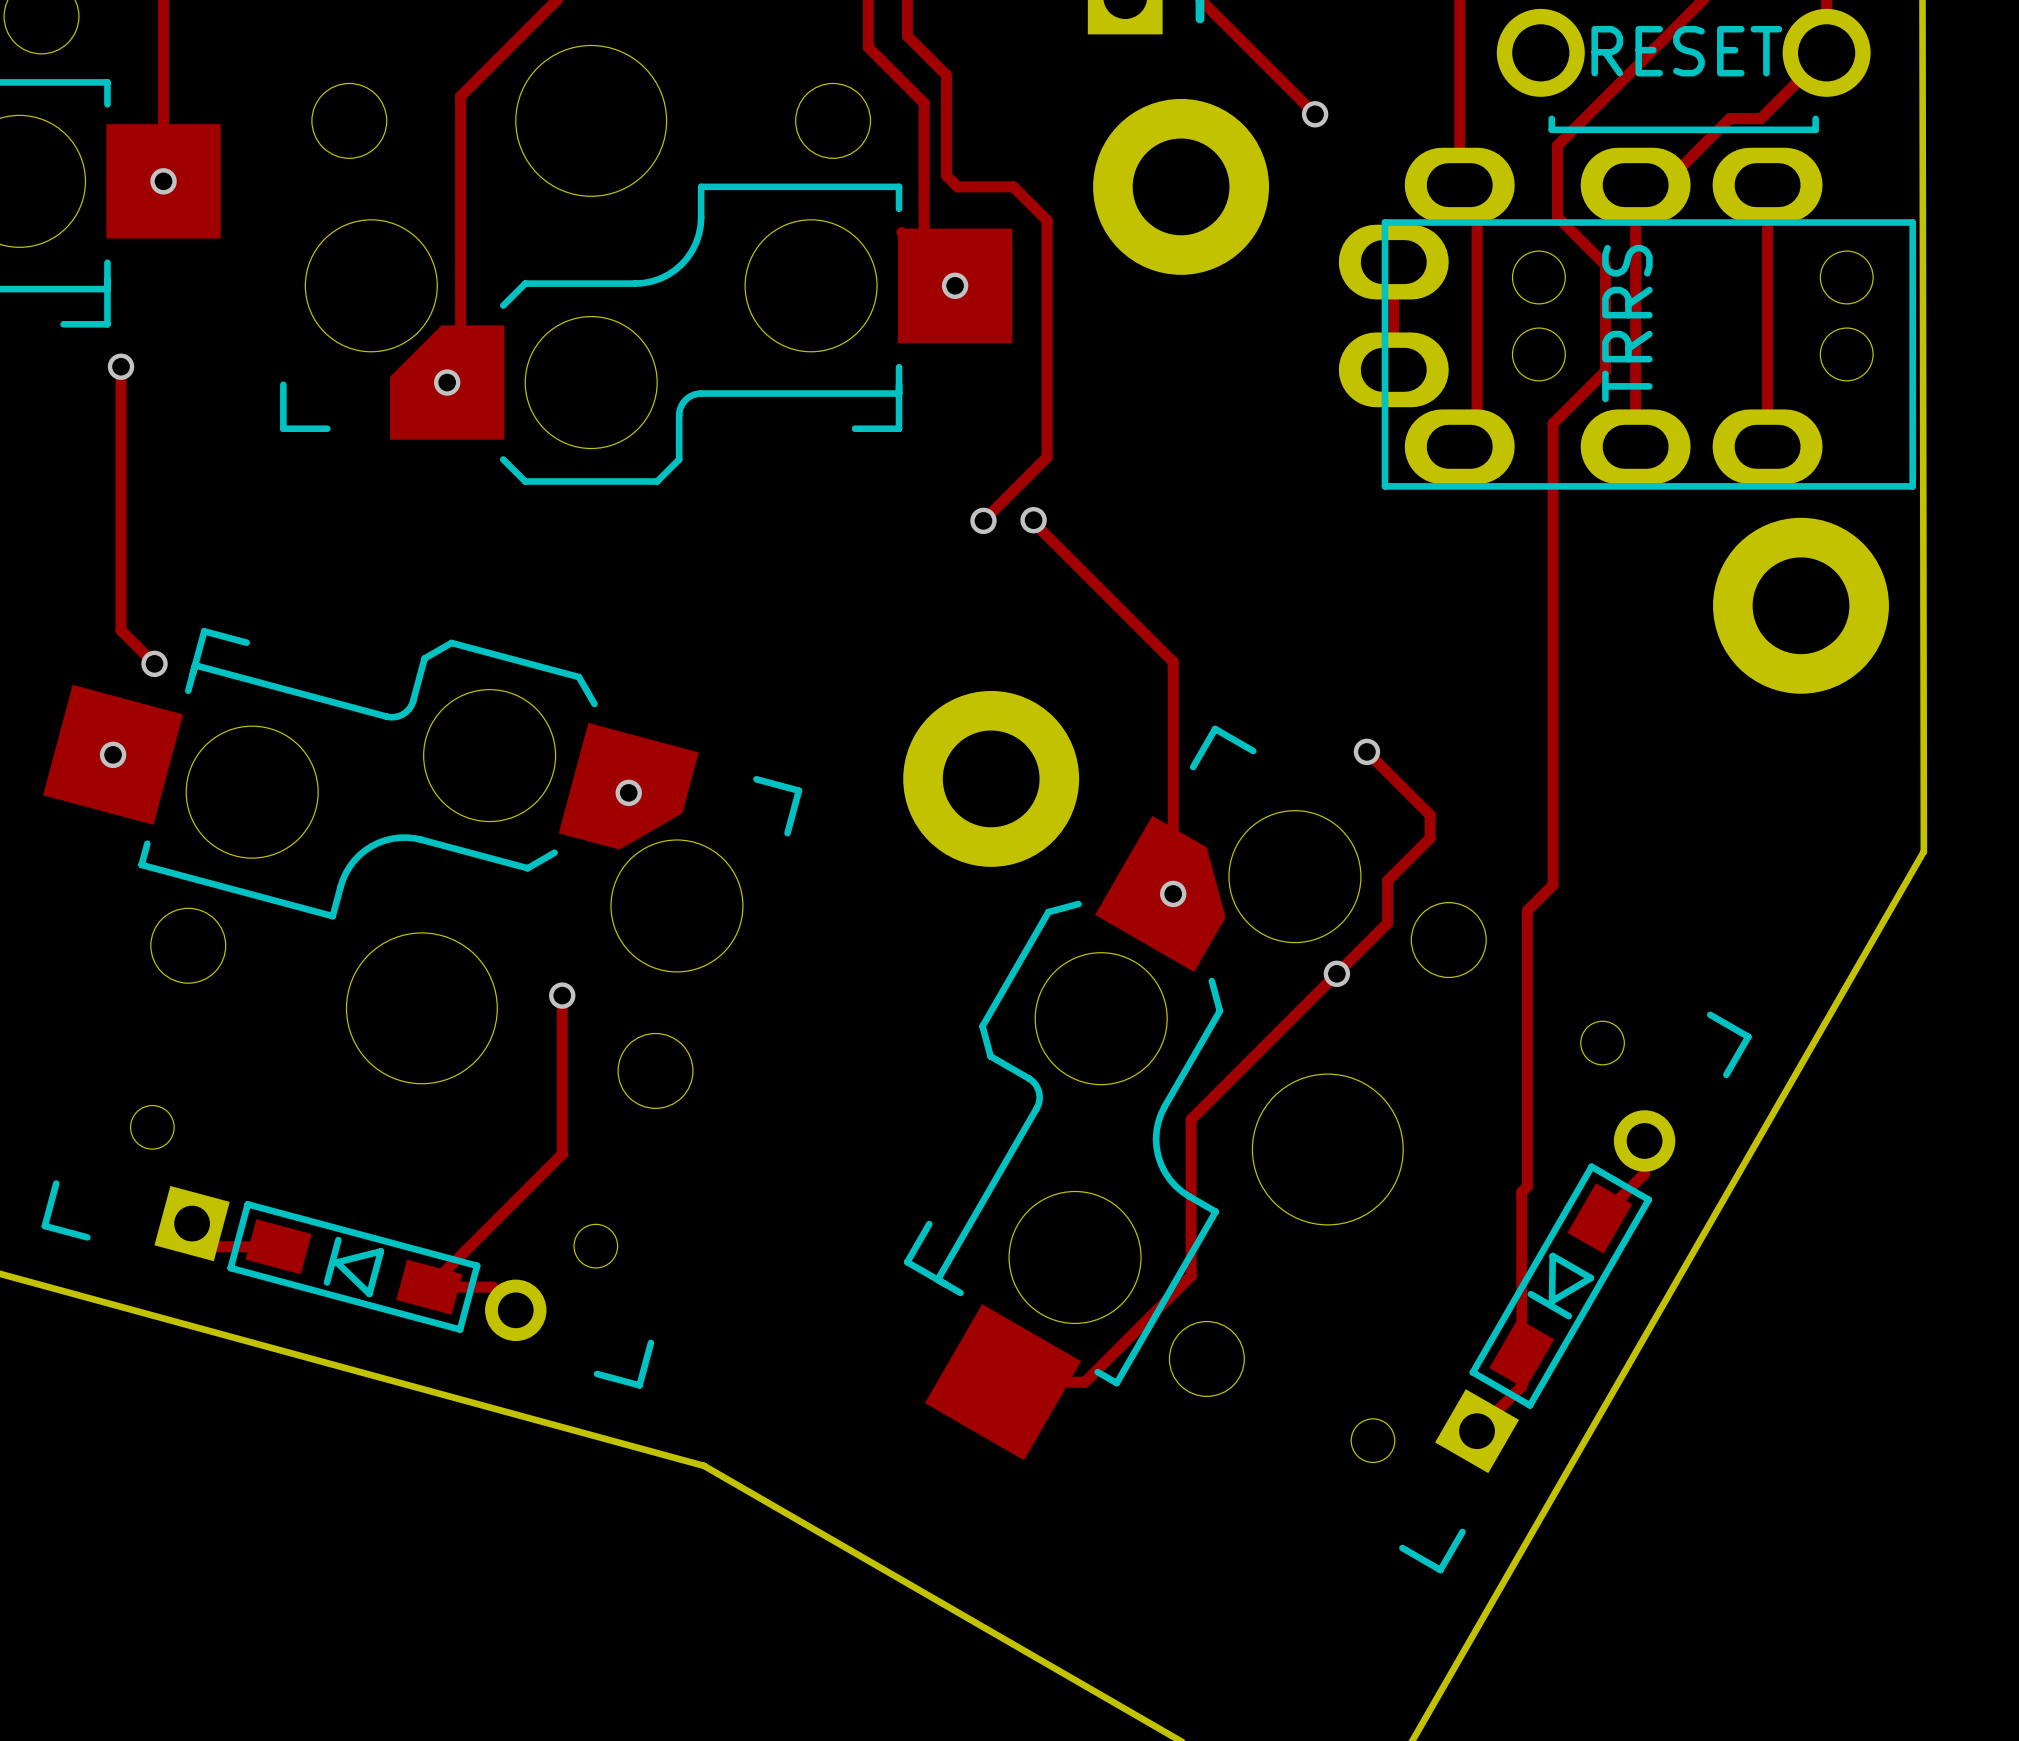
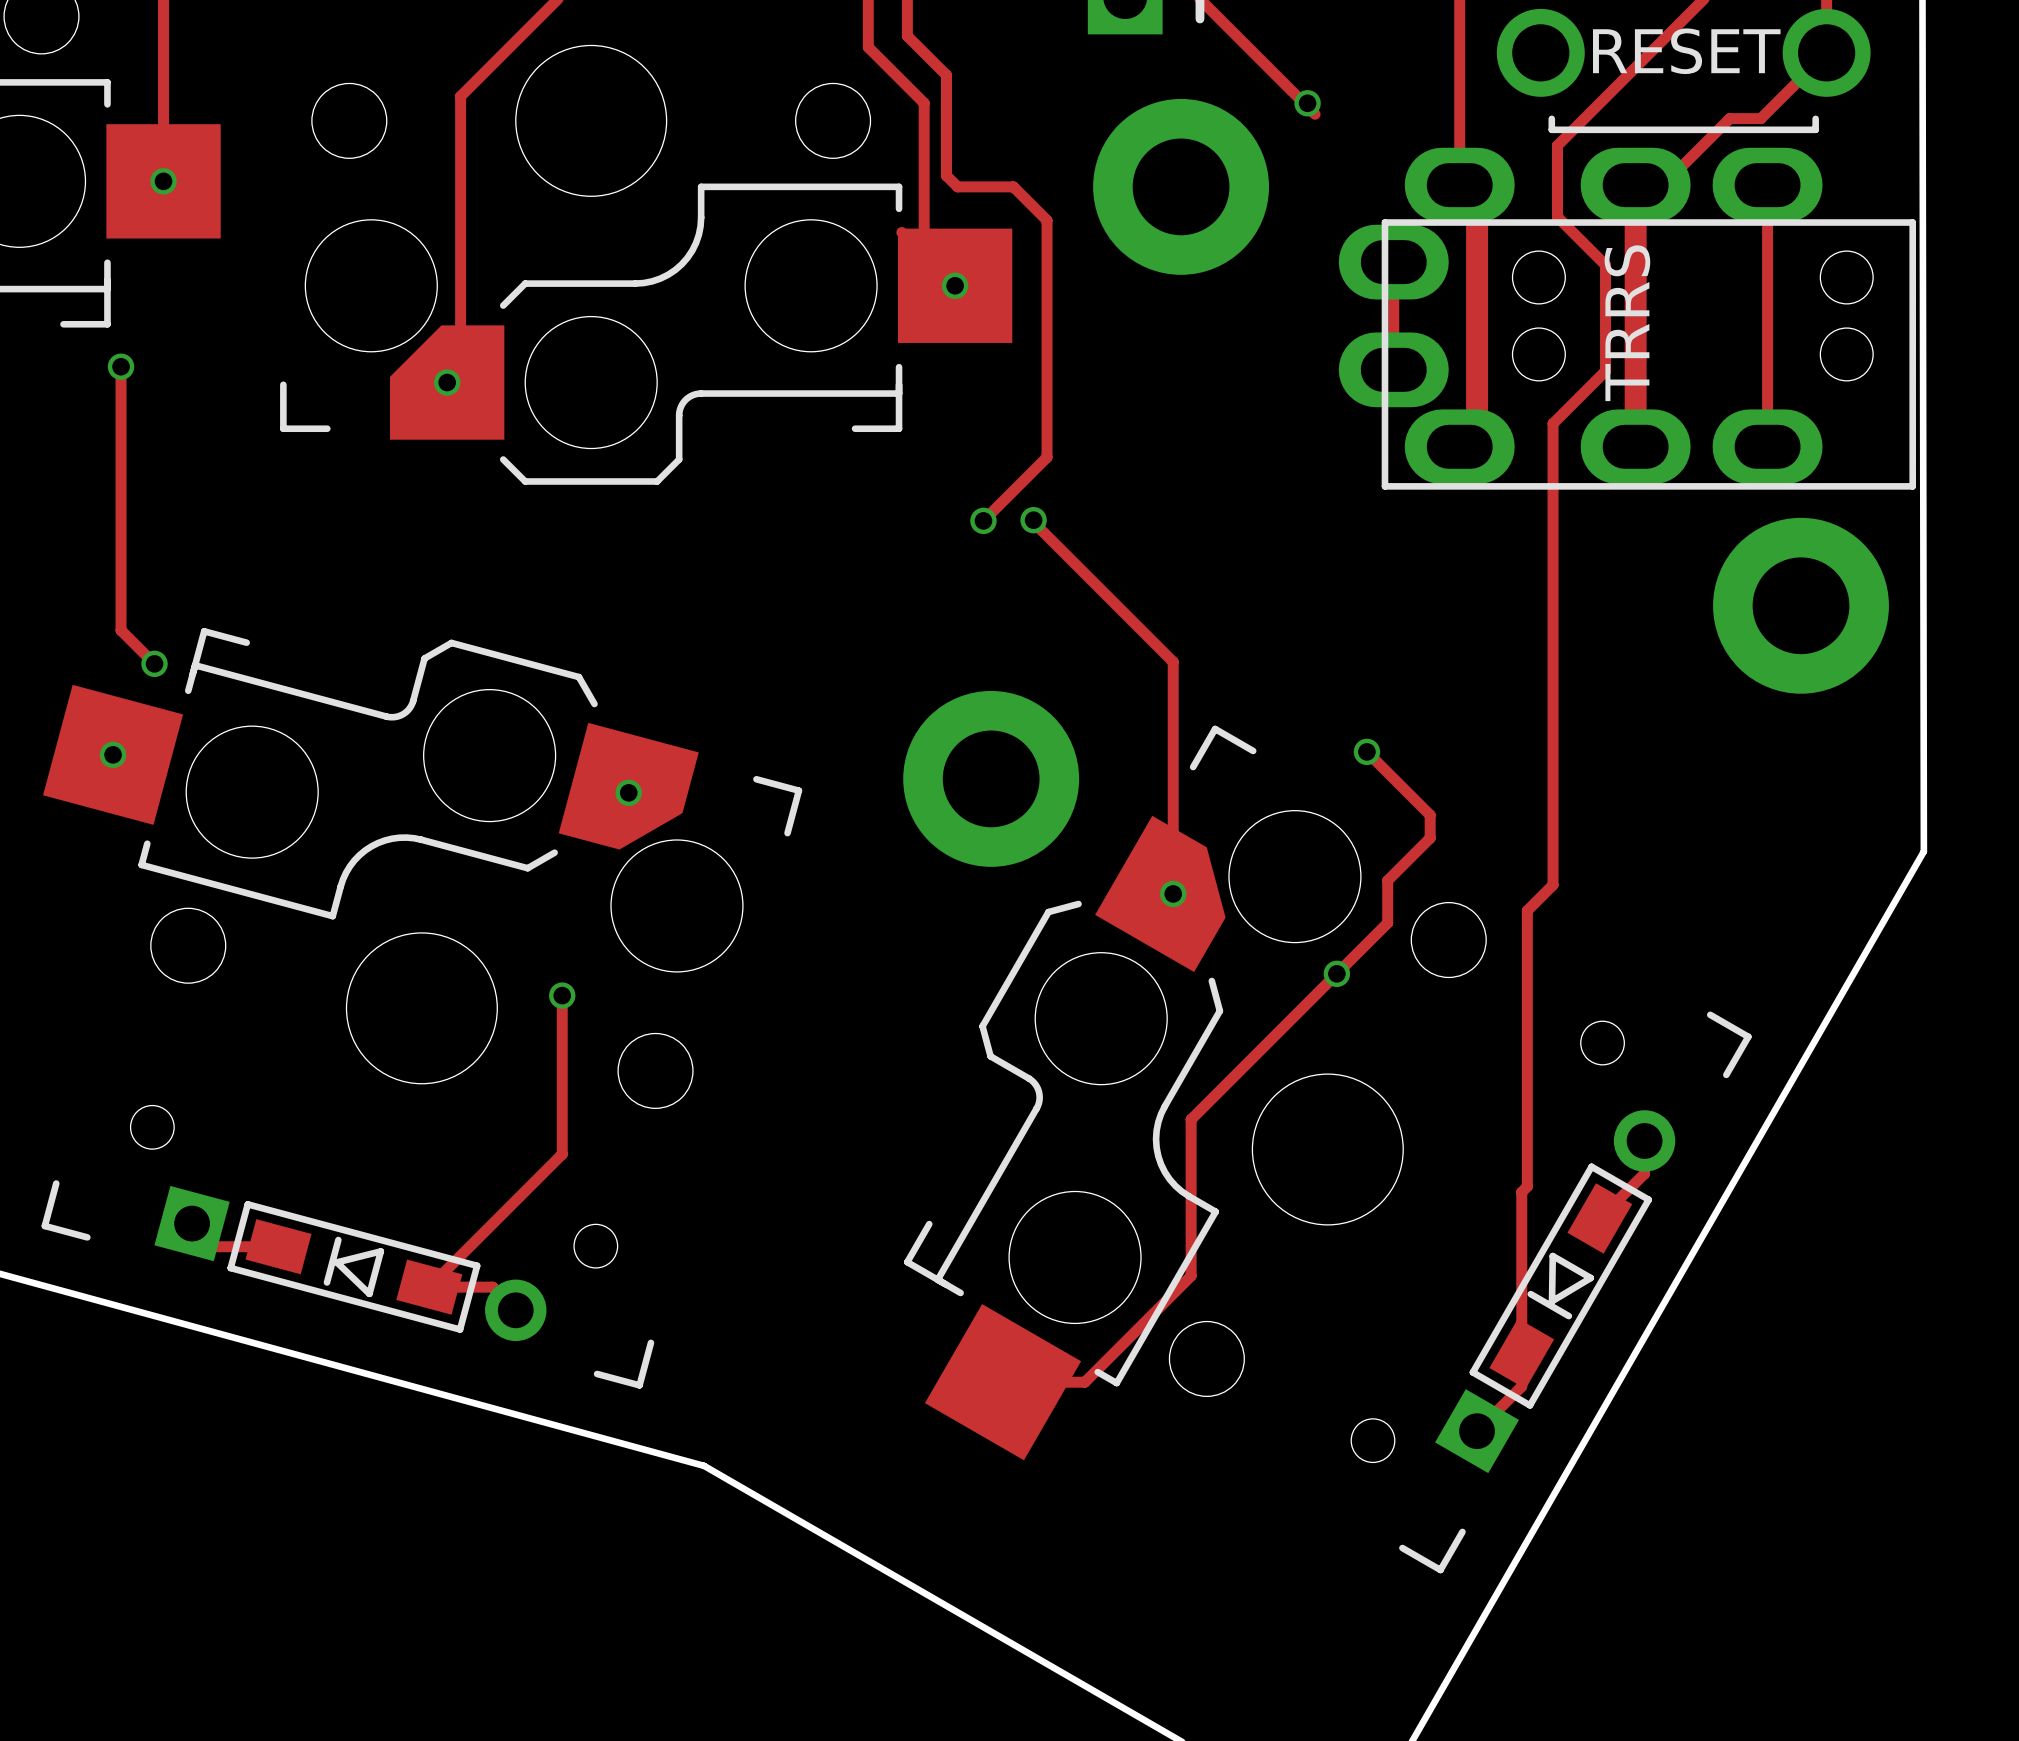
via position: (1315, 114) -> (1307, 103)
track width: thin (1635, 185) (1635, 446) -> thick (1635, 185) (1635, 446)
track width: thin (1477, 202) (1477, 429) -> thick (1477, 202) (1477, 429)

